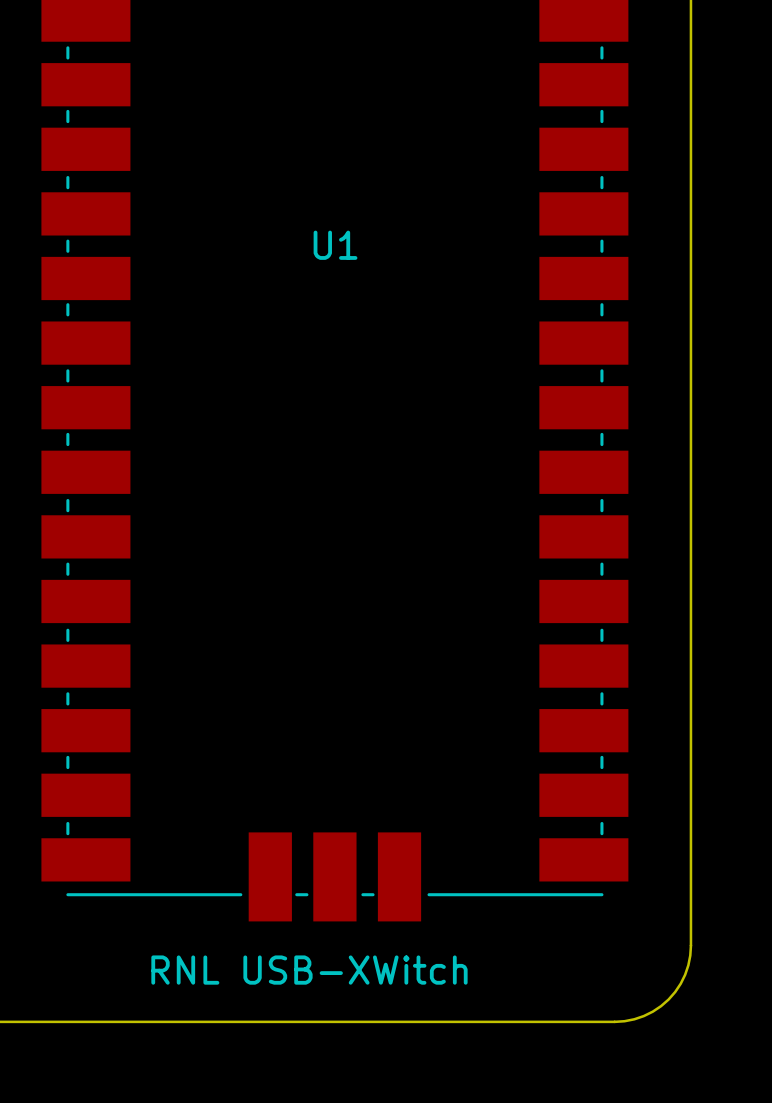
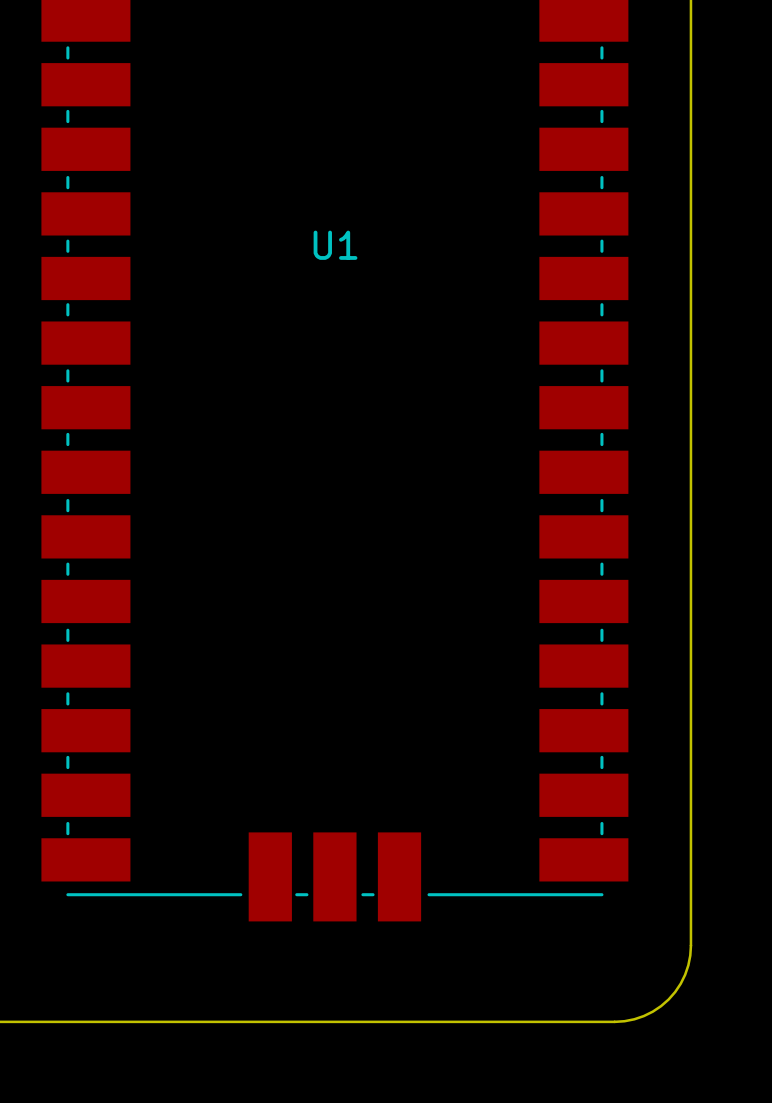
text: RNL USB-XWitch (309, 970) -> none

